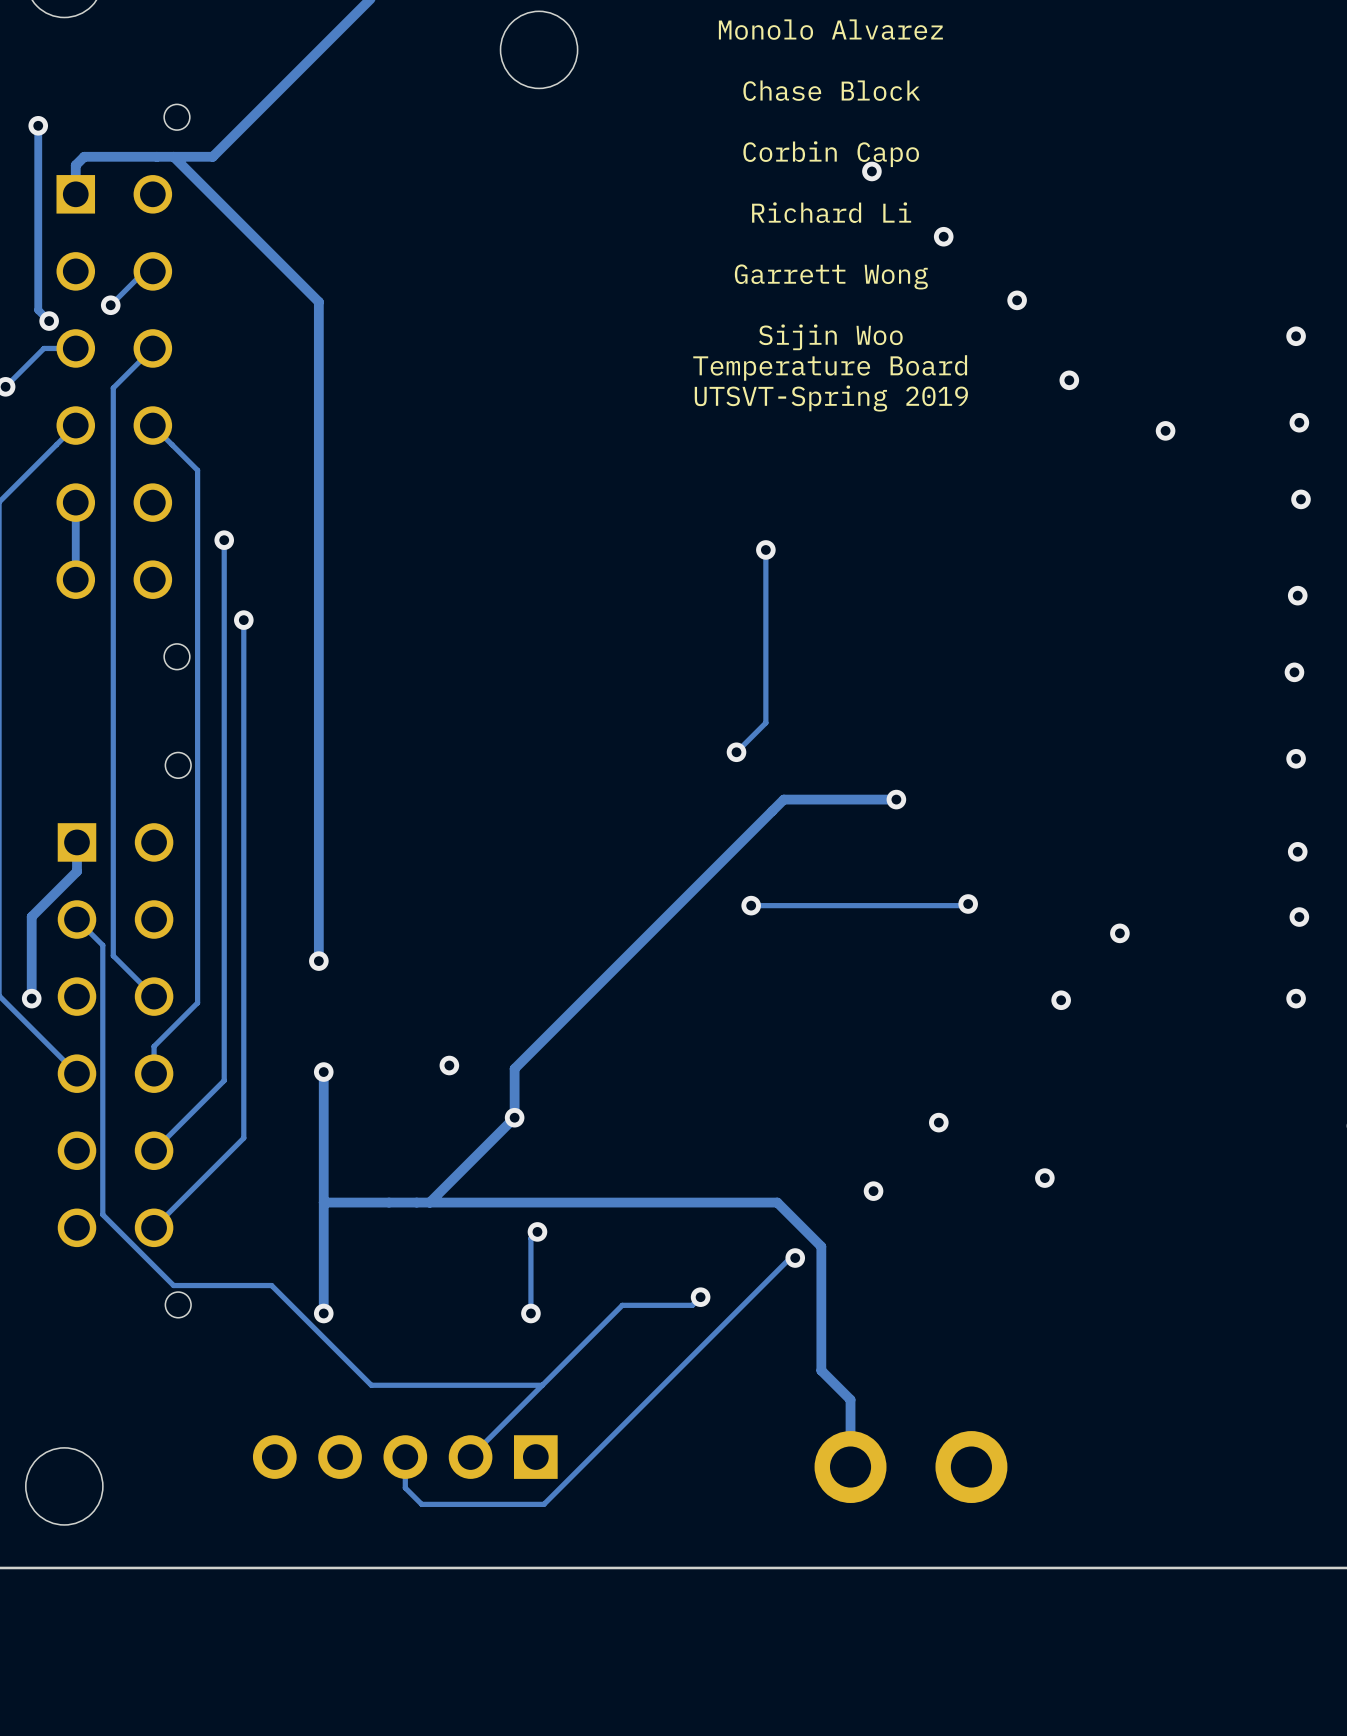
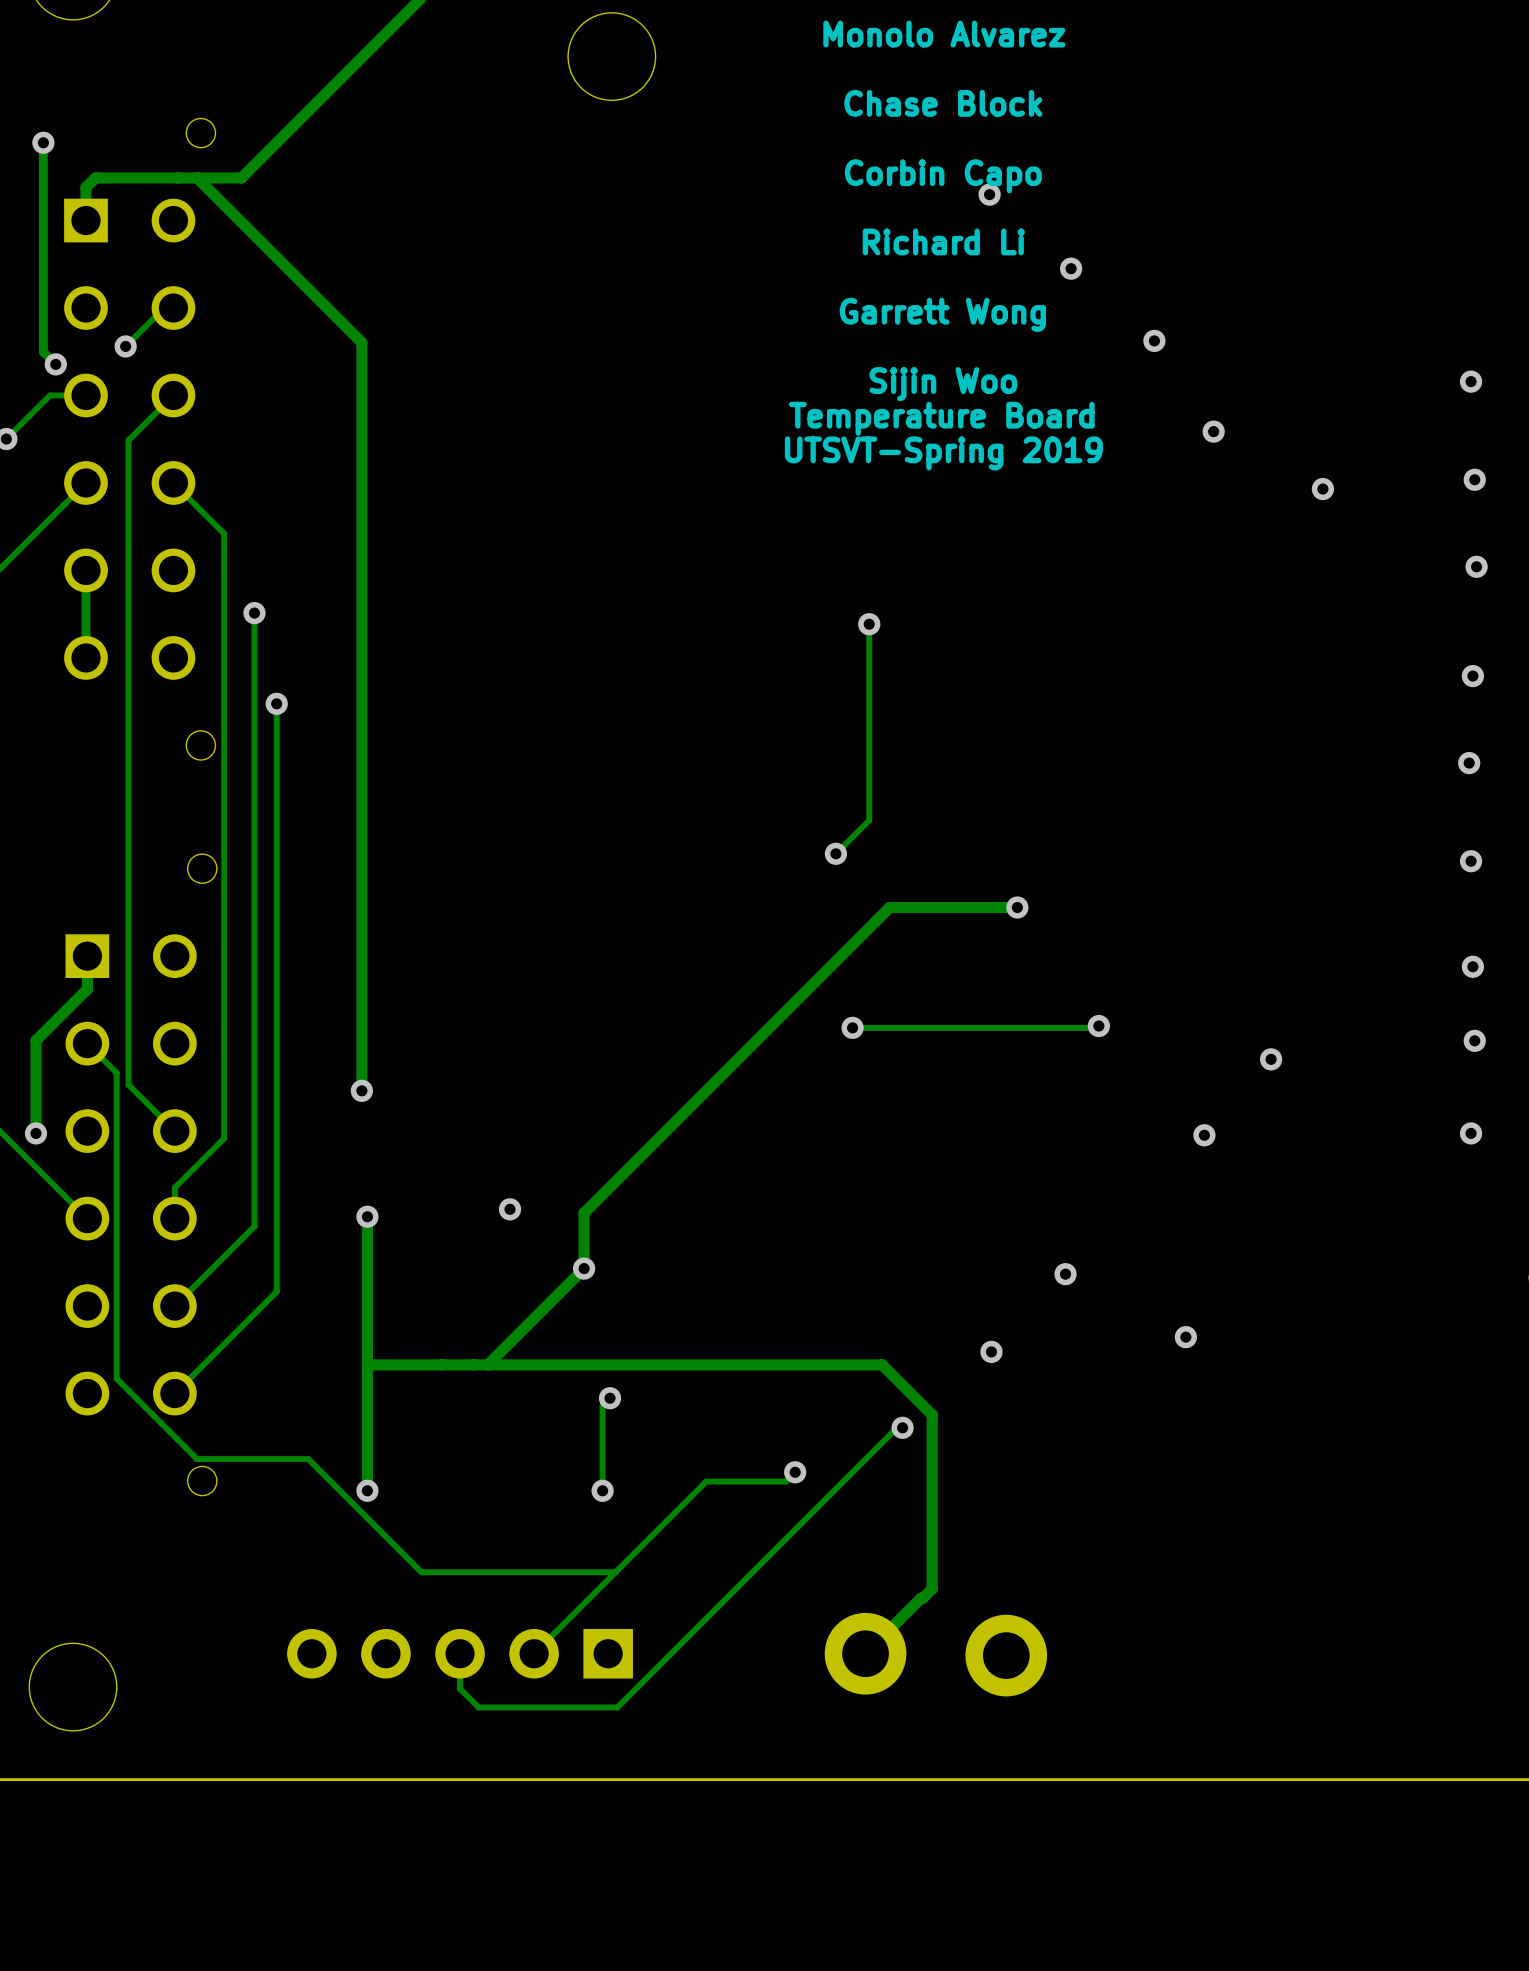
track: (821, 1370) (850, 1399) (850, 1467) -> (932, 1555) (932, 1588) (865, 1653)
part: none -> (865, 1653)
part position: (850, 1467) -> (1006, 1655)
part: (971, 1467) -> none

